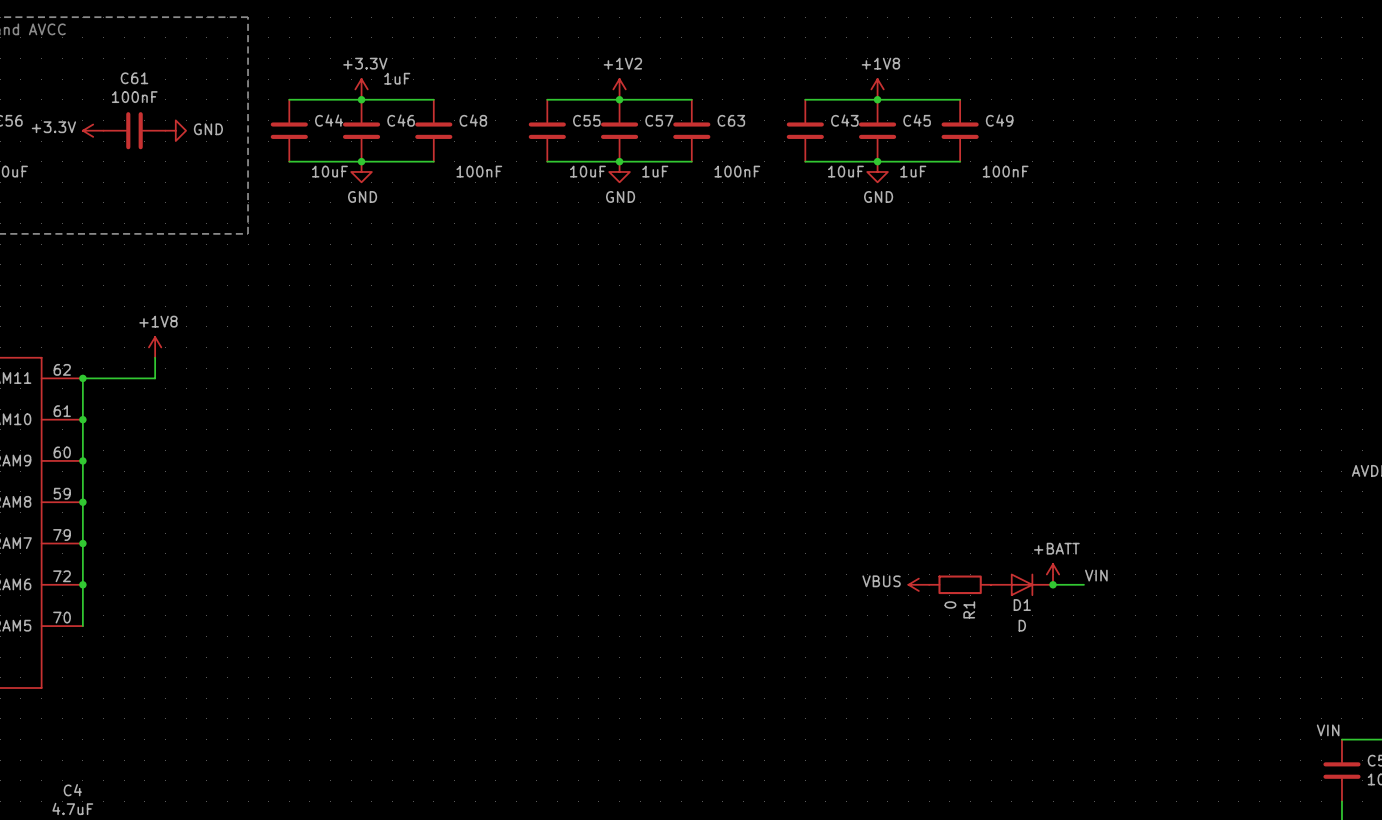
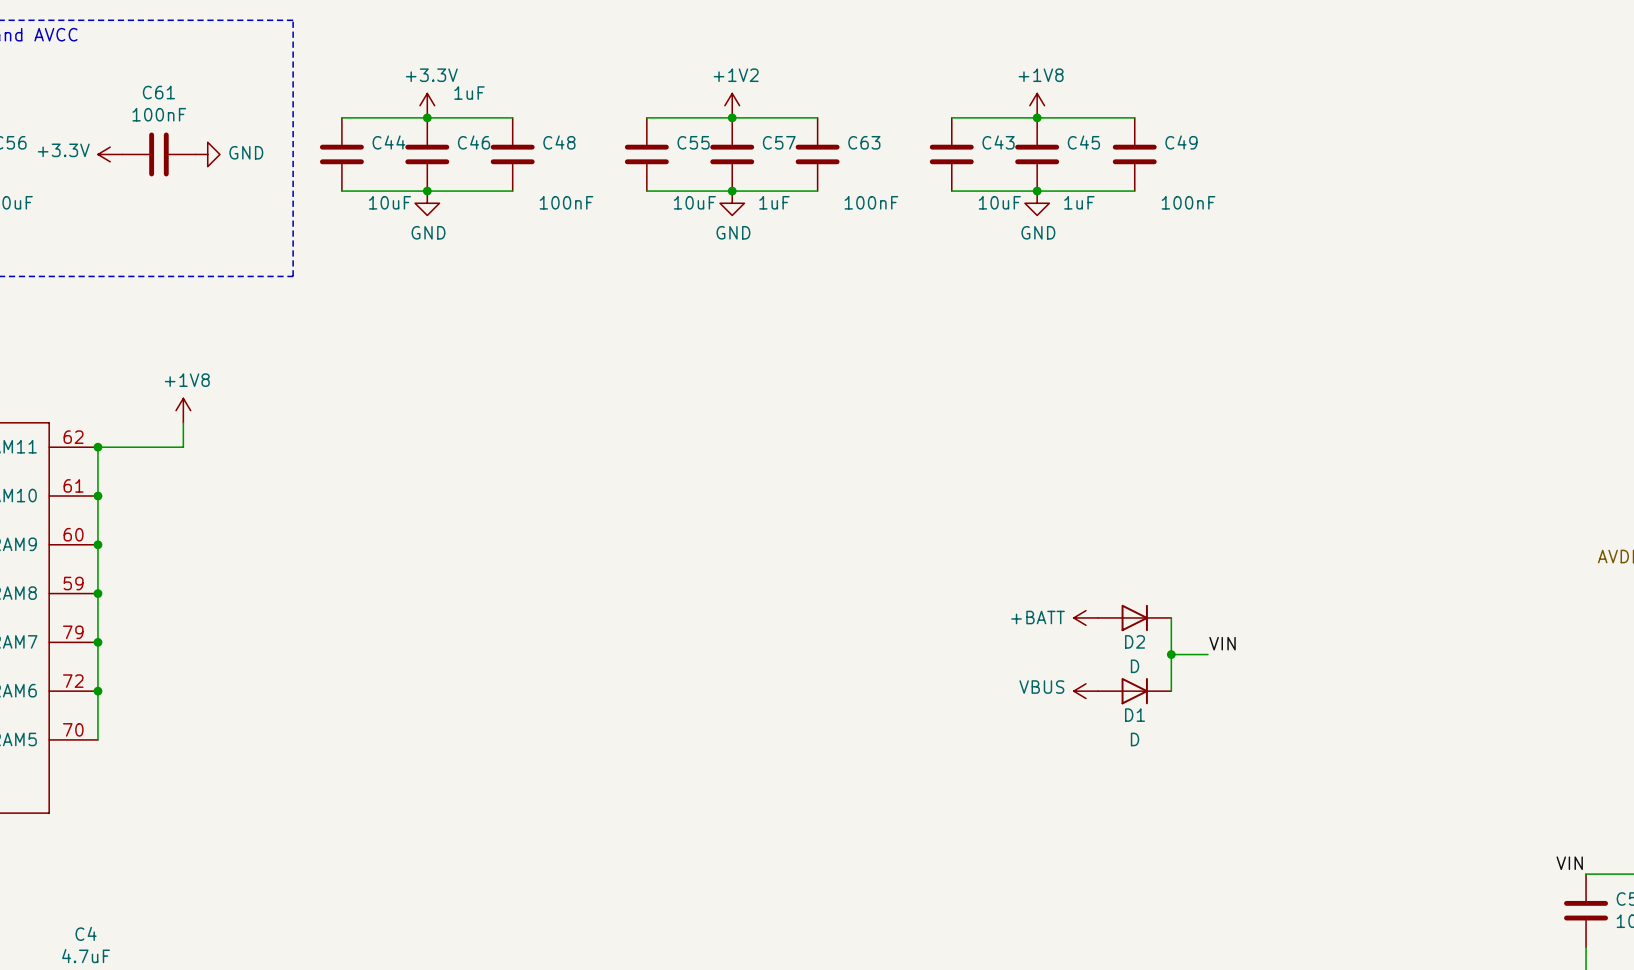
D2: none -> D (1134, 617)
wire: none -> (1171, 617) (1171, 691)
power symbol text position: +BATT (1056, 548) -> +BATT (1038, 617)
junction: none -> (1171, 654)
power symbol rotation: 0° (1053, 574) -> 90° counterclockwise (1085, 617)
power symbol position: +BATT (1053, 574) -> +BATT (1085, 617)
label position: VIN (1096, 575) -> VIN (1222, 643)
R1: 0 (960, 584) -> none
D1 position: (1022, 584) -> (1134, 691)
wire: (1053, 584) (1083, 584) -> (1171, 654) (1207, 654)
junction: (1053, 584) -> none

